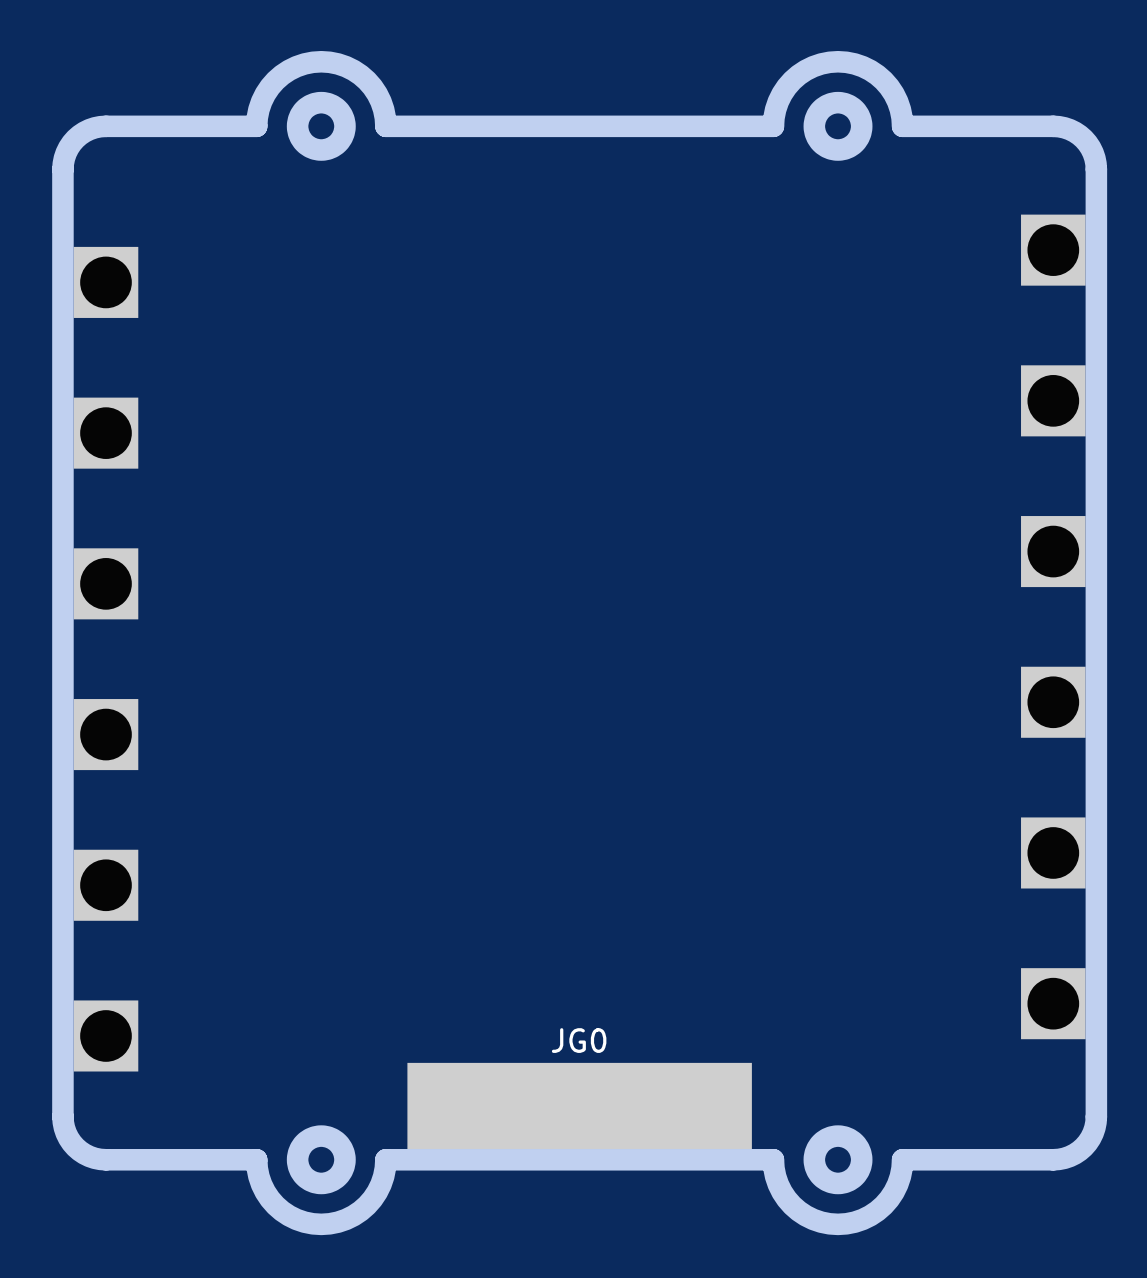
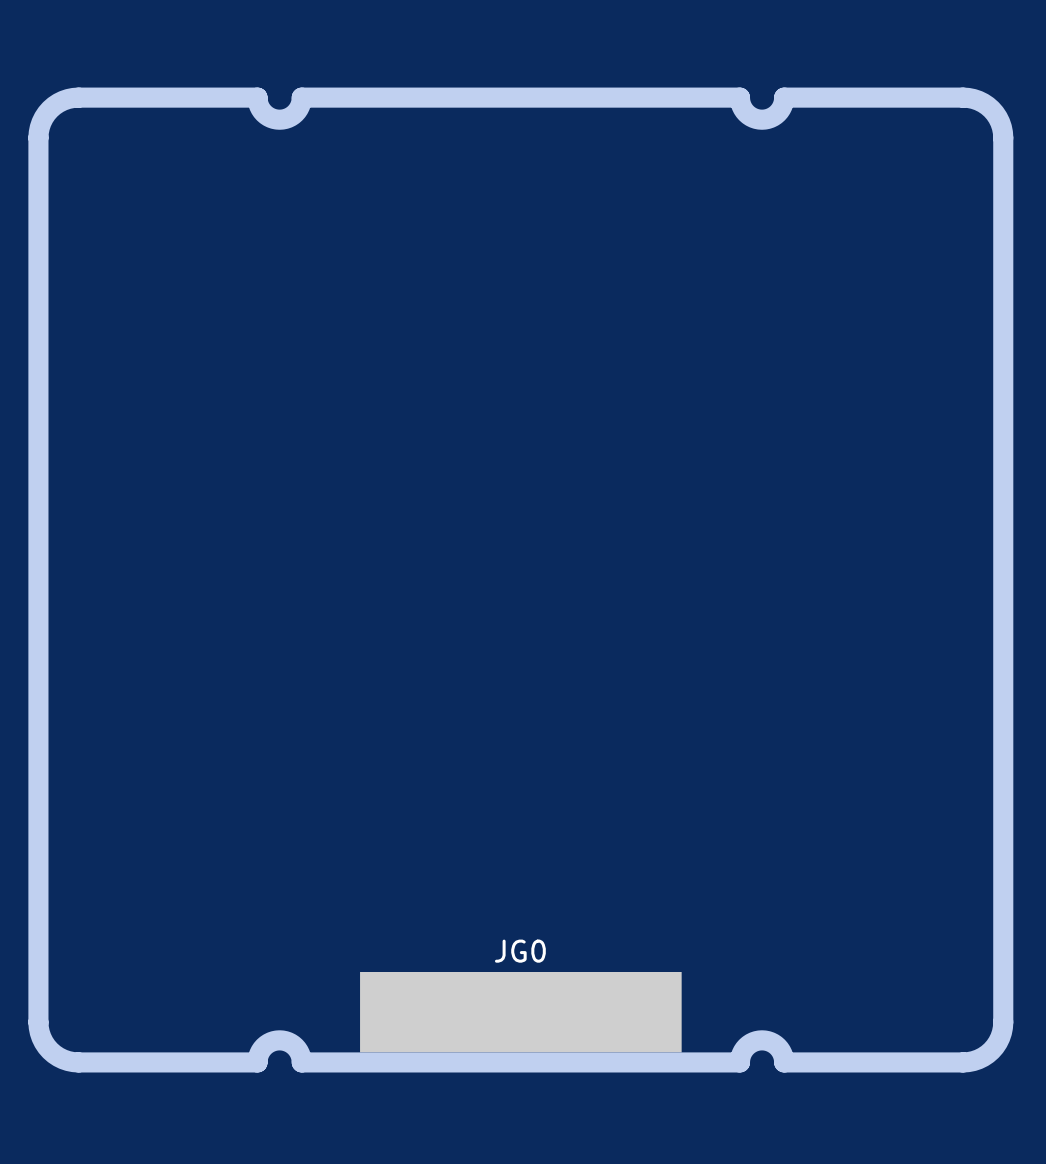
round board edge: [286, 91, 356, 161] -> none
round board edge: [803, 91, 873, 161] -> none
board edge: (385, 126) (380, 101) (366, 80) (346, 66) (321, 61) (296, 66) (275, 80) (261, 101) (256, 126) -> (339, 97) (301, 97) (300, 106) (295, 113) (288, 118) (279, 119) (271, 118) (264, 113) (259, 106) (257, 97) (219, 97)
board edge: (902, 126) (897, 101) (883, 80) (862, 66) (838, 61) (813, 66) (792, 80) (778, 101) (773, 126) -> (822, 97) (784, 97) (782, 106) (777, 113) (770, 118) (762, 119) (753, 118) (746, 113) (741, 106) (739, 97) (701, 97)
part: (1053, 250) -> none
part: (105, 282) -> none
part: (1053, 400) -> none
part: (105, 433) -> none
part: (1053, 551) -> none
part: (105, 583) -> none
part: (1053, 702) -> none
part: (105, 734) -> none
part: (1053, 852) -> none
part: (105, 885) -> none
part: (1053, 1003) -> none
part: (105, 1035) -> none
round board edge: [286, 1125, 356, 1195] -> none
round board edge: [803, 1125, 873, 1195] -> none
board edge: (385, 1159) (380, 1184) (366, 1205) (346, 1219) (321, 1224) (296, 1219) (275, 1205) (261, 1184) (256, 1159) -> (339, 1062) (301, 1062) (300, 1053) (295, 1046) (288, 1042) (279, 1040) (271, 1042) (264, 1046) (259, 1053) (257, 1062) (219, 1062)
board edge: (902, 1159) (897, 1184) (883, 1205) (862, 1219) (838, 1224) (813, 1219) (792, 1205) (778, 1184) (773, 1159) -> (822, 1062) (784, 1062) (782, 1053) (777, 1046) (770, 1042) (762, 1040) (753, 1042) (746, 1046) (741, 1053) (739, 1062) (701, 1062)

